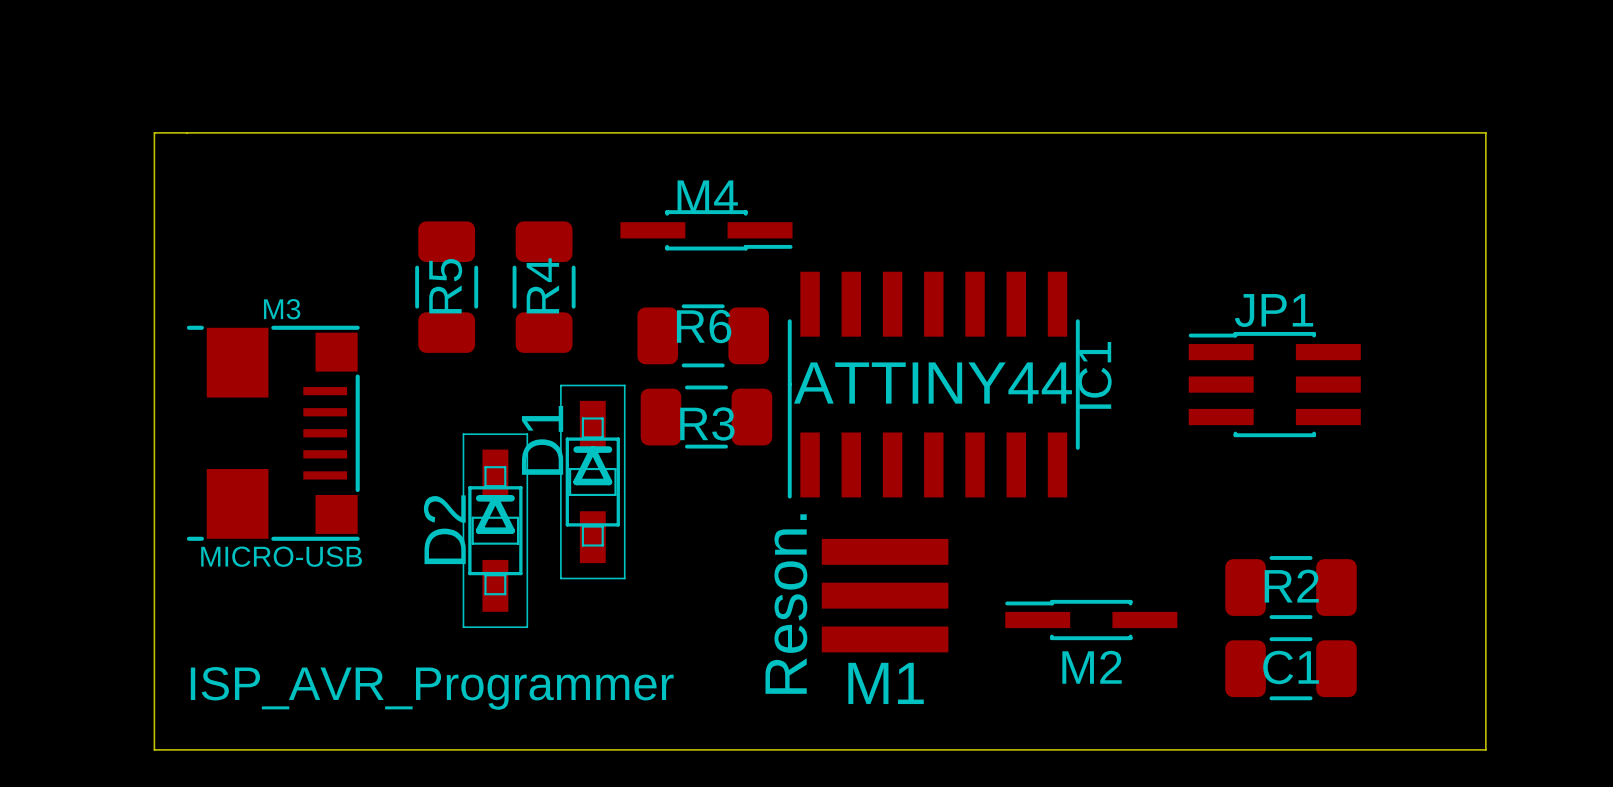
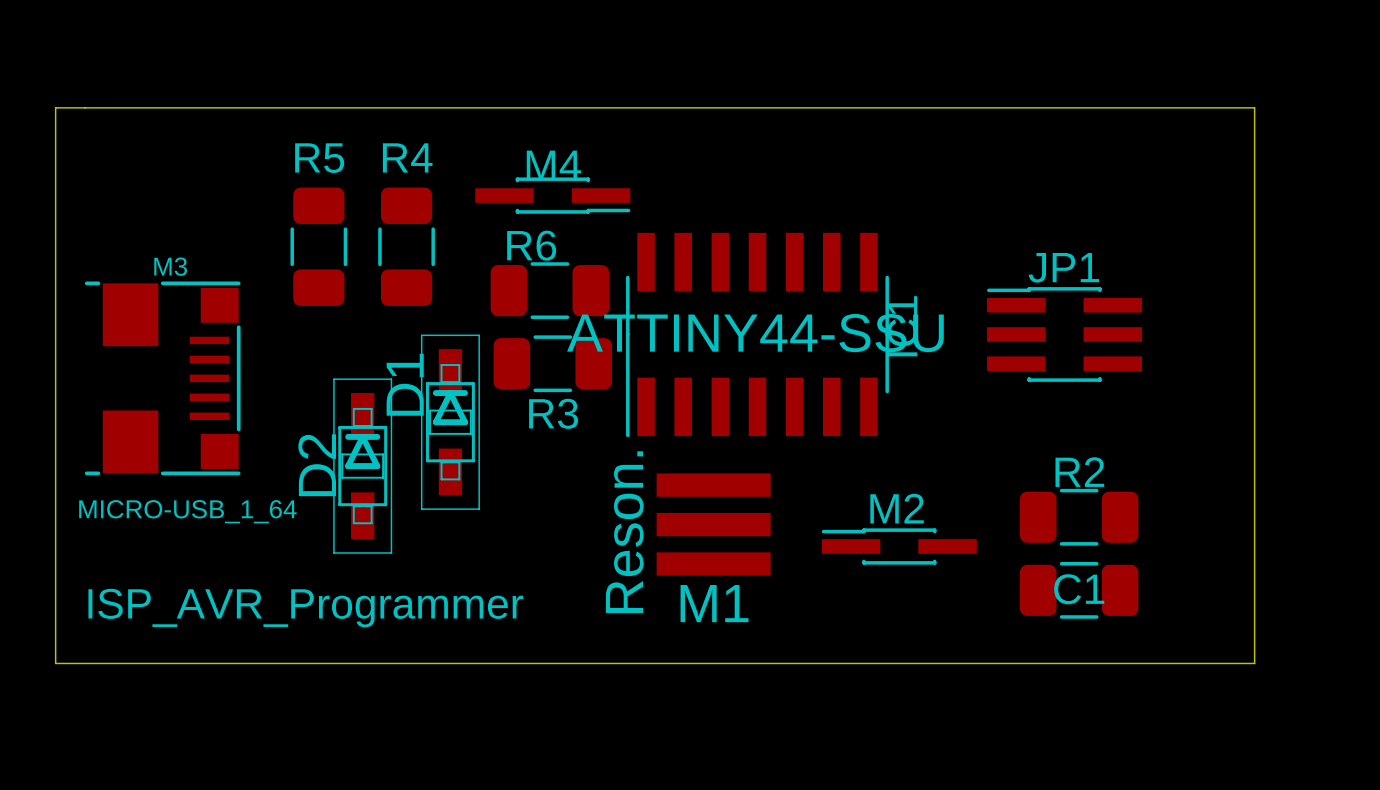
R4 name rotation: 0° (542, 285) -> 90° clockwise (407, 157)
R4 name position: R4 (542, 285) -> R4 (407, 157)
R5 name rotation: 0° (445, 286) -> 90° clockwise (319, 158)
R5 name position: R5 (445, 286) -> R5 (319, 158)
R6 name position: R6 (704, 326) -> R6 (531, 245)
IC1 value: ATTINY44 (932, 383) -> ATTINY44-SSU (755, 333)
R3 name position: R3 (707, 423) -> R3 (553, 413)
M3 value: MICRO-USB (281, 556) -> MICRO-USB_1_64 (187, 511)
R2 name position: R2 (1291, 586) -> R2 (1079, 472)
M2 name position: M2 (1092, 667) -> M2 (897, 508)

